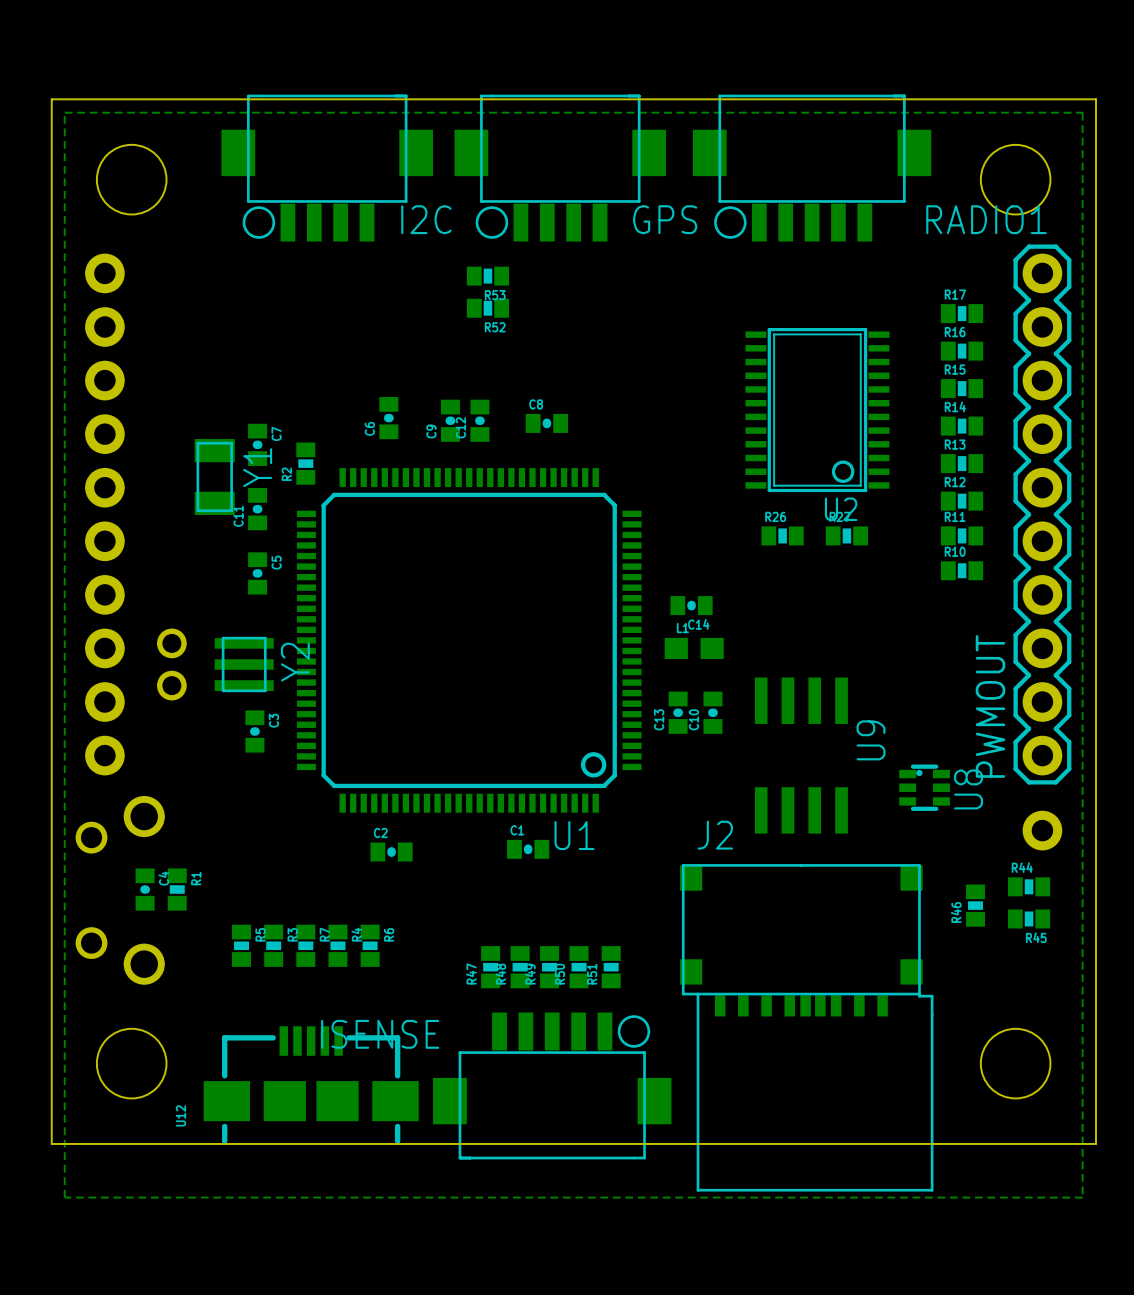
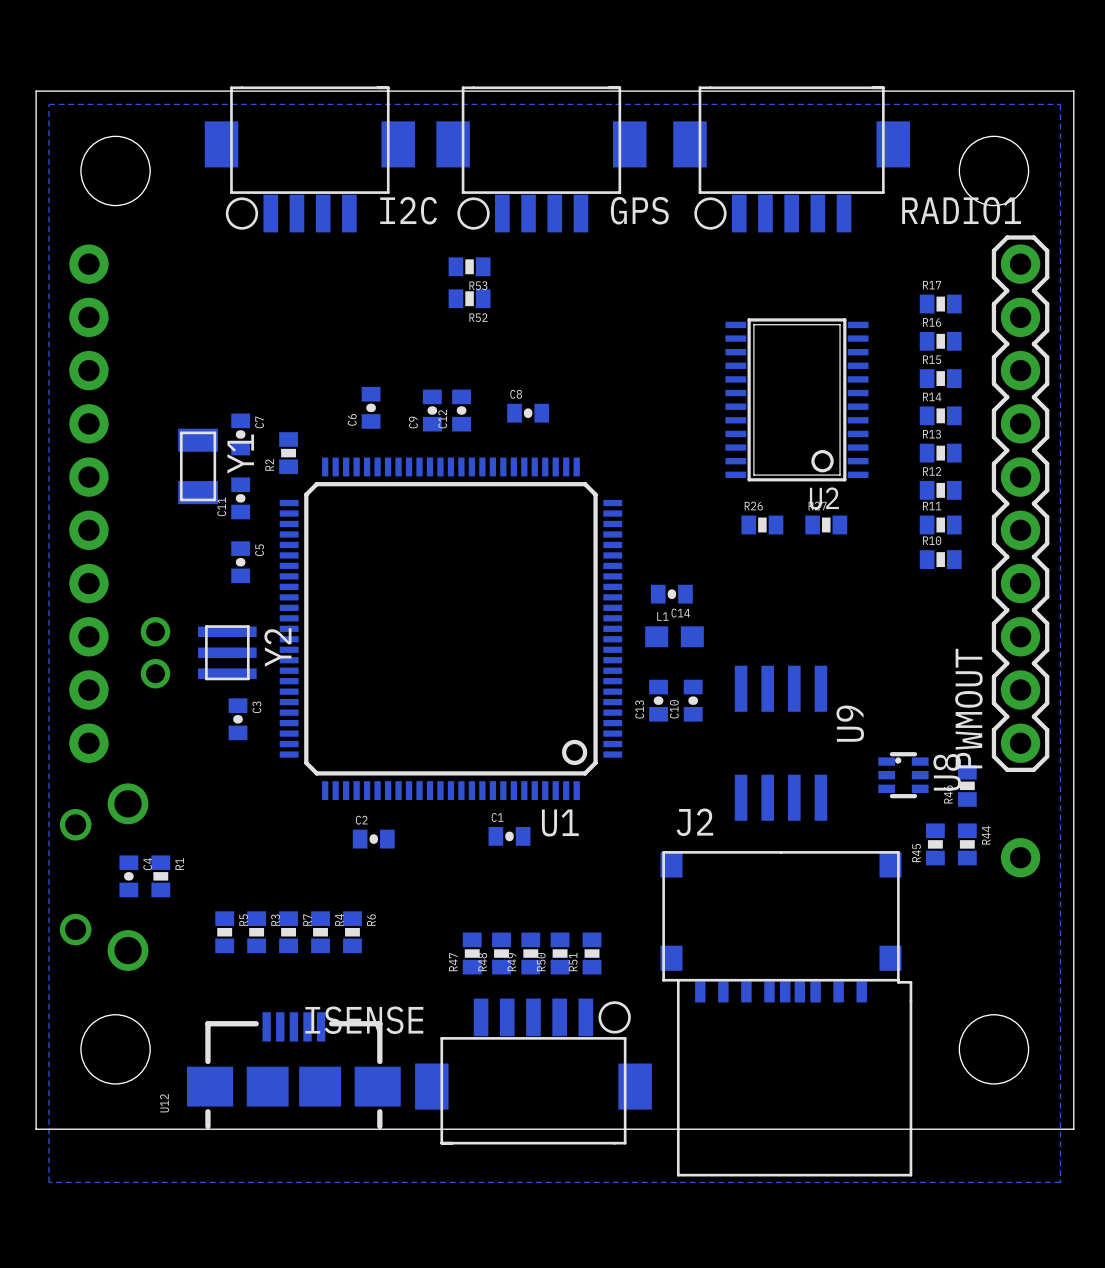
part position: (1042, 830) -> (1020, 857)
R44 rotation: 0° (1029, 886) -> 90° clockwise (967, 844)
R44 position: (1029, 886) -> (967, 844)
R46 position: (975, 905) -> (967, 785)
R45 rotation: 0° (1029, 918) -> 90° clockwise (935, 844)
R45 position: (1029, 918) -> (935, 844)

